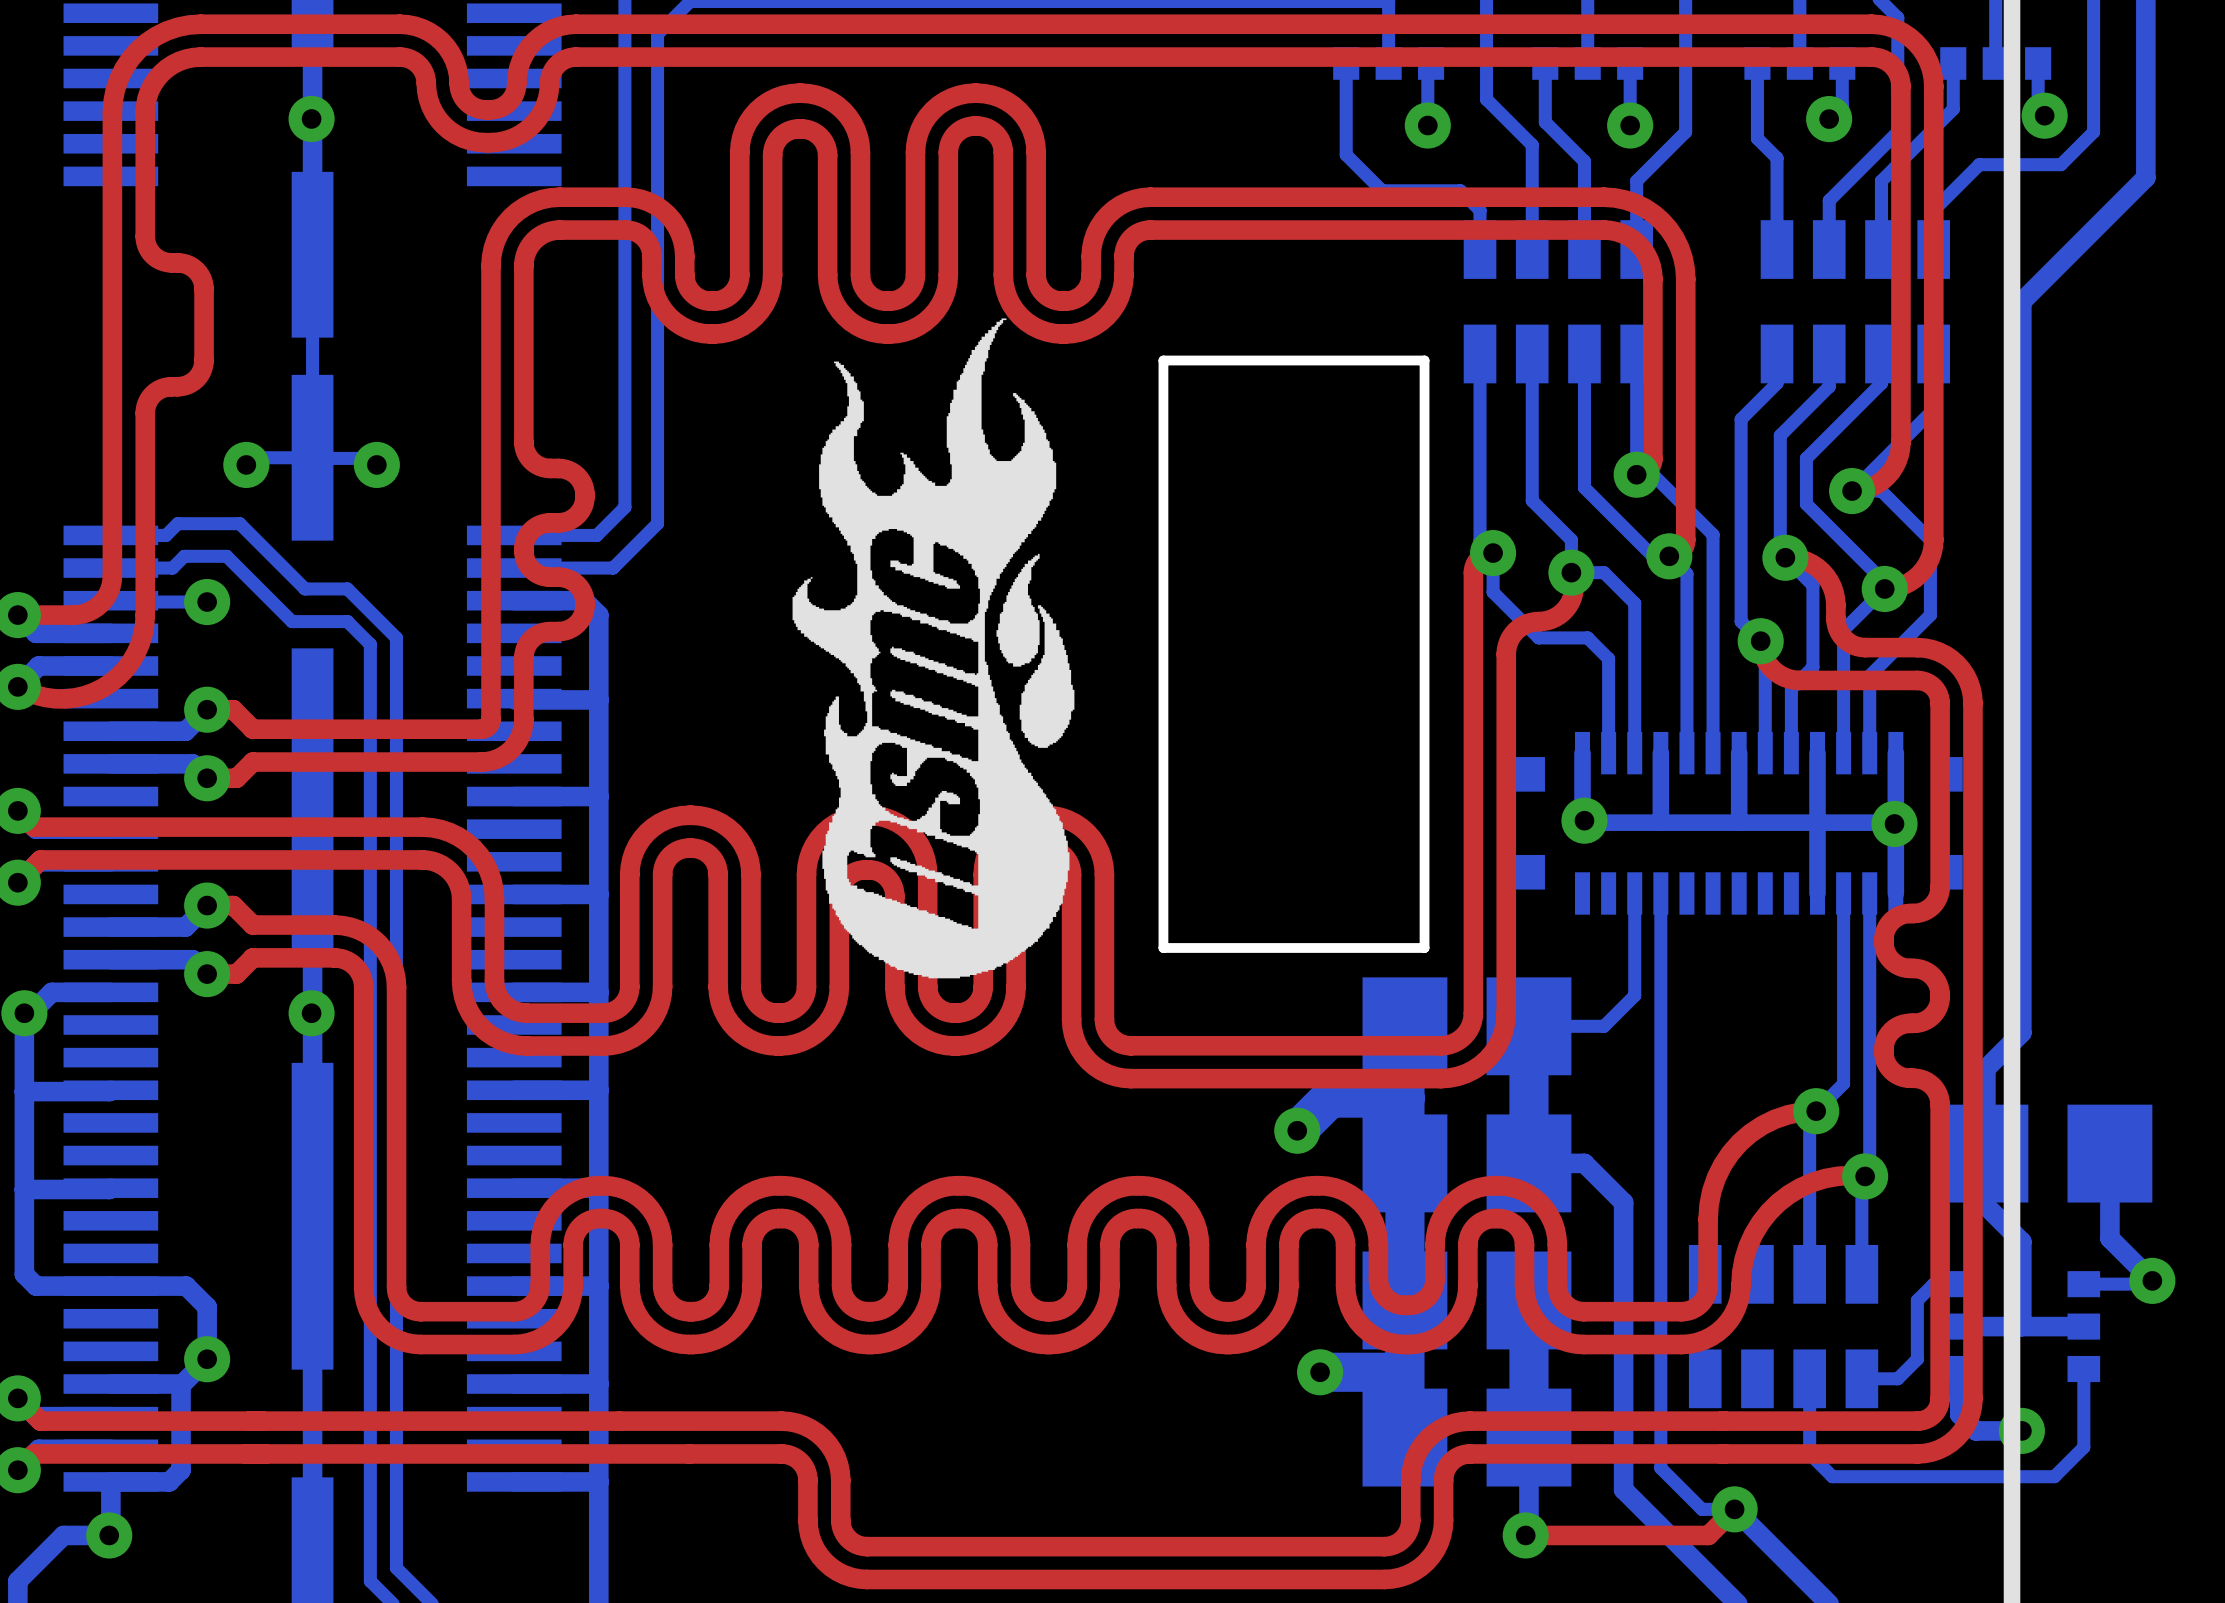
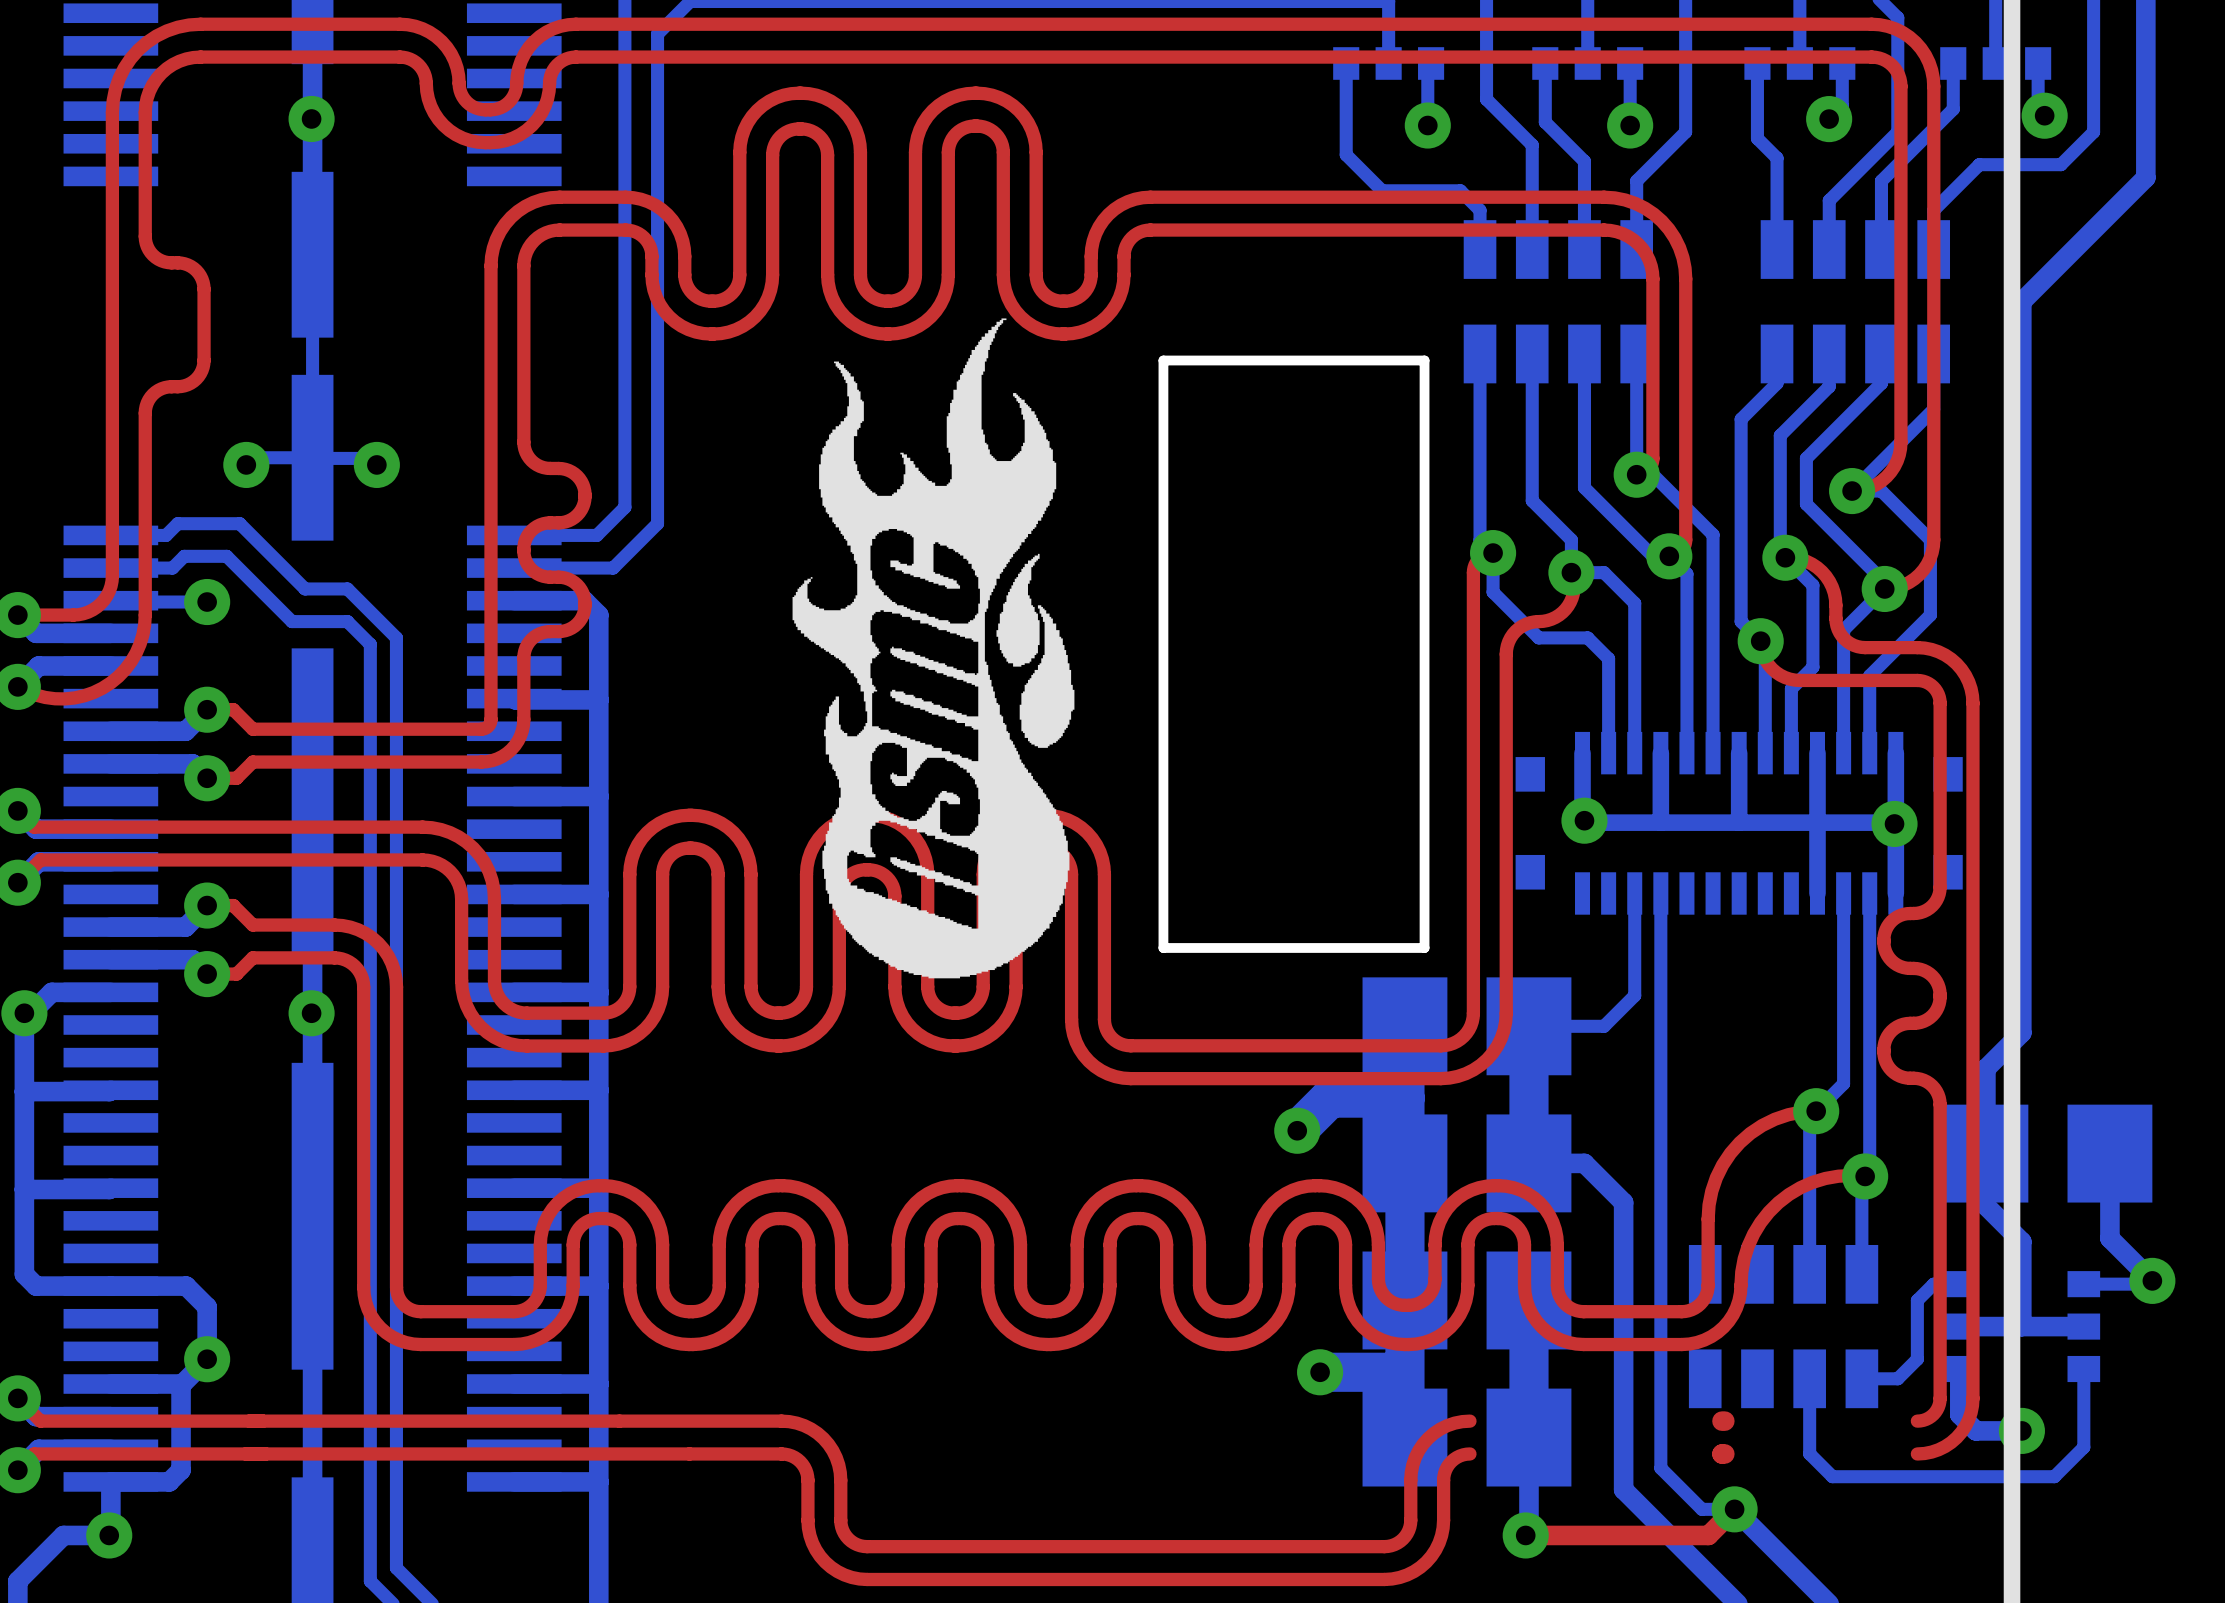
top track width: thick (1636, 474) (1648, 469) (1652, 460) (1652, 278) (1651, 266) (1646, 254) (1633, 240) (1622, 233) (1604, 230) (1146, 230) (1134, 235) (1126, 246) (1121, 290) (1116, 304) (1106, 316) (1094, 326) (1080, 332) (1054, 333) (1039, 329) (1026, 321) (1015, 310) (1007, 297) (1003, 274) (1002, 145) (997, 136) (990, 129) (980, 126) (971, 126) (956, 133) (948, 148) (948, 274) (943, 297) (930, 316) (918, 326) (896, 333) (879, 333) (864, 329) (850, 321) (839, 310) (832, 297) (827, 274) (826, 148) (822, 139) (814, 132) (804, 129) (792, 129) (778, 139) (772, 151) (772, 274) (770, 290) (764, 304) (755, 316) (736, 329) (721, 333) (703, 333) (681, 326) (669, 316) (659, 304) (653, 290) (649, 246) (644, 237) (635, 232) (625, 230) (554, 230) (537, 237) (526, 252) (523, 265) (524, 448) (529, 458) (537, 464) (546, 468) (565, 469) (574, 473) (583, 484) (585, 496) (581, 509) (571, 519) (562, 522) (543, 523) (531, 530) (524, 542) (524, 554) (527, 564) (537, 573) (546, 576) (565, 578) (574, 582) (583, 593) (585, 605) (583, 615) (574, 626) (565, 630) (540, 633) (527, 644) (523, 657) (523, 725) (518, 740) (511, 749) (497, 758) (481, 762) (252, 762) (236, 778) (207, 778) -> thin (1636, 474) (1648, 469) (1652, 460) (1652, 278) (1651, 266) (1646, 254) (1633, 240) (1622, 233) (1604, 230) (1146, 230) (1134, 235) (1126, 246) (1121, 290) (1116, 304) (1106, 316) (1094, 326) (1080, 332) (1054, 333) (1039, 329) (1026, 321) (1015, 310) (1007, 297) (1003, 274) (1002, 145) (997, 136) (990, 129) (980, 126) (971, 126) (956, 133) (948, 148) (948, 274) (943, 297) (930, 316) (918, 326) (896, 333) (879, 333) (864, 329) (850, 321) (839, 310) (832, 297) (827, 274) (826, 148) (822, 139) (814, 132) (804, 129) (792, 129) (778, 139) (772, 151) (772, 274) (770, 290) (764, 304) (755, 316) (736, 329) (721, 333) (703, 333) (681, 326) (669, 316) (659, 304) (653, 290) (649, 246) (644, 237) (635, 232) (625, 230) (554, 230) (537, 237) (526, 252) (523, 265) (524, 448) (529, 458) (537, 464) (546, 468) (565, 469) (574, 473) (583, 484) (585, 496) (581, 509) (571, 519) (562, 522) (543, 523) (531, 530) (524, 542) (524, 554) (527, 564) (537, 573) (546, 576) (565, 578) (574, 582) (583, 593) (585, 605) (583, 615) (574, 626) (565, 630) (540, 633) (527, 644) (523, 657) (523, 725) (518, 740) (511, 749) (497, 758) (481, 762) (252, 762) (236, 778) (207, 778)
top track width: thick (1852, 491) (1870, 487) (1886, 476) (1897, 460) (1900, 442) (1900, 86) (1894, 68) (1879, 58) (575, 57) (562, 60) (553, 70) (545, 106) (532, 125) (513, 138) (498, 142) (485, 142) (462, 138) (443, 125) (430, 106) (422, 70) (415, 62) (406, 57) (193, 57) (172, 64) (161, 73) (149, 91) (145, 105) (146, 243) (150, 252) (158, 259) (187, 264) (200, 276) (204, 289) (204, 360) (202, 370) (193, 381) (184, 385) (168, 386) (158, 390) (150, 397) (146, 406) (145, 615) (142, 634) (136, 653) (125, 669) (110, 682) (93, 692) (74, 697) (55, 698) (35, 695) (17, 686) -> thin (1852, 491) (1870, 487) (1886, 476) (1897, 460) (1900, 442) (1900, 86) (1894, 68) (1879, 58) (575, 57) (562, 60) (553, 70) (545, 106) (532, 125) (513, 138) (498, 142) (485, 142) (462, 138) (443, 125) (430, 106) (422, 70) (415, 62) (406, 57) (193, 57) (172, 64) (161, 73) (149, 91) (145, 105) (146, 243) (150, 252) (158, 259) (187, 264) (200, 276) (204, 289) (204, 360) (202, 370) (193, 381) (184, 385) (168, 386) (158, 390) (150, 397) (146, 406) (145, 615) (142, 634) (136, 653) (125, 669) (110, 682) (93, 692) (74, 697) (55, 698) (35, 695) (17, 686)
top track width: thick (1493, 553) (1479, 558) (1473, 572) (1473, 1017) (1470, 1025) (1463, 1036) (1453, 1043) (1445, 1045) (1130, 1045) (1117, 1042) (1107, 1032) (1104, 1022) (1104, 874) (1102, 859) (1096, 844) (1087, 832) (1074, 823) (1052, 815) (1034, 815) (1012, 823) (1000, 832) (987, 851) (983, 874) (982, 990) (977, 1002) (966, 1011) (956, 1013) (943, 1011) (935, 1005) (928, 993) (927, 874) (925, 859) (919, 844) (910, 832) (898, 823) (883, 817) (868, 815) (850, 817) (836, 823) (823, 832) (814, 844) (808, 859) (806, 874) (805, 993) (798, 1005) (786, 1012) (773, 1012) (761, 1007) (754, 999) (751, 990) (750, 874) (746, 851) (733, 832) (721, 823) (707, 817) (689, 815) (673, 817) (659, 823) (647, 832) (634, 851) (629, 874) (629, 990) (624, 1002) (616, 1009) (606, 1012) (527, 1013) (518, 1012) (507, 1006) (498, 996) (495, 989) (494, 899) (488, 871) (473, 848) (450, 832) (422, 827) (34, 827) (17, 810) -> thin (1493, 553) (1479, 558) (1473, 572) (1473, 1017) (1470, 1025) (1463, 1036) (1453, 1043) (1445, 1045) (1130, 1045) (1117, 1042) (1107, 1032) (1104, 1022) (1104, 874) (1102, 859) (1096, 844) (1087, 832) (1074, 823) (1052, 815) (1034, 815) (1012, 823) (1000, 832) (987, 851) (983, 874) (982, 990) (977, 1002) (966, 1011) (956, 1013) (943, 1011) (935, 1005) (928, 993) (927, 874) (925, 859) (919, 844) (910, 832) (898, 823) (883, 817) (868, 815) (850, 817) (836, 823) (823, 832) (814, 844) (808, 859) (806, 874) (805, 993) (798, 1005) (786, 1012) (773, 1012) (761, 1007) (754, 999) (751, 990) (750, 874) (746, 851) (733, 832) (721, 823) (707, 817) (689, 815) (673, 817) (659, 823) (647, 832) (634, 851) (629, 874) (629, 990) (624, 1002) (616, 1009) (606, 1012) (527, 1013) (518, 1012) (507, 1006) (498, 996) (495, 989) (494, 899) (488, 871) (473, 848) (450, 832) (422, 827) (34, 827) (17, 810)
top track width: thick (1669, 556) (1680, 551) (1685, 539) (1685, 268) (1679, 247) (1668, 229) (1644, 208) (1625, 199) (1604, 197) (1142, 197) (1120, 205) (1103, 220) (1093, 241) (1090, 278) (1087, 288) (1074, 299) (1059, 301) (1043, 293) (1036, 278) (1036, 152) (1031, 129) (1018, 110) (1006, 101) (984, 93) (966, 93) (952, 97) (938, 105) (927, 116) (919, 129) (915, 152) (914, 281) (910, 290) (902, 297) (892, 301) (883, 301) (868, 293) (860, 278) (860, 152) (855, 129) (843, 110) (830, 101) (808, 93) (791, 93) (769, 101) (757, 110) (747, 122) (741, 137) (739, 152) (739, 278) (736, 288) (726, 297) (716, 301) (707, 301) (697, 297) (690, 290) (685, 278) (682, 241) (676, 226) (661, 209) (640, 199) (625, 197) (559, 197) (541, 199) (517, 211) (505, 224) (496, 239) (490, 265) (490, 719) (488, 726) (481, 729) (252, 729) (233, 709) (207, 709) -> thin (1669, 556) (1680, 551) (1685, 539) (1685, 268) (1679, 247) (1668, 229) (1644, 208) (1625, 199) (1604, 197) (1142, 197) (1120, 205) (1103, 220) (1093, 241) (1090, 278) (1087, 288) (1074, 299) (1059, 301) (1043, 293) (1036, 278) (1036, 152) (1031, 129) (1018, 110) (1006, 101) (984, 93) (966, 93) (952, 97) (938, 105) (927, 116) (919, 129) (915, 152) (914, 281) (910, 290) (902, 297) (892, 301) (883, 301) (868, 293) (860, 278) (860, 152) (855, 129) (843, 110) (830, 101) (808, 93) (791, 93) (769, 101) (757, 110) (747, 122) (741, 137) (739, 152) (739, 278) (736, 288) (726, 297) (716, 301) (707, 301) (697, 297) (690, 290) (685, 278) (682, 241) (676, 226) (661, 209) (640, 199) (625, 197) (559, 197) (541, 199) (517, 211) (505, 224) (496, 239) (490, 265) (490, 719) (488, 726) (481, 729) (252, 729) (233, 709) (207, 709)
top track width: thick (1785, 557) (1806, 561) (1817, 567) (1826, 576) (1834, 592) (1836, 625) (1847, 641) (1861, 647) (1917, 647) (1938, 651) (1951, 659) (1961, 669) (1968, 681) (1972, 695) (1972, 1405) (1968, 1419) (1956, 1437) (1938, 1449) (1917, 1453) -> thin (1785, 557) (1806, 561) (1817, 567) (1826, 576) (1834, 592) (1836, 625) (1847, 641) (1861, 647) (1917, 647) (1938, 651) (1951, 659) (1961, 669) (1968, 681) (1972, 695) (1972, 1405) (1968, 1419) (1956, 1437) (1938, 1449) (1917, 1453)
top track width: thick (1571, 572) (1573, 589) (1572, 598) (1565, 609) (1551, 619) (1522, 625) (1512, 634) (1507, 645) (1505, 1021) (1501, 1038) (1492, 1053) (1473, 1069) (1457, 1076) (1440, 1078) (1130, 1078) (1115, 1076) (1101, 1070) (1083, 1055) (1073, 1034) (1071, 1019) (1071, 871) (1063, 855) (1048, 848) (1039, 848) (1029, 851) (1021, 858) (1016, 867) (1016, 986) (1011, 1009) (1003, 1022) (986, 1038) (972, 1043) (956, 1046) (938, 1043) (924, 1038) (912, 1028) (899, 1009) (894, 986) (894, 892) (887, 877) (871, 870) (862, 870) (852, 873) (844, 880) (840, 889) (838, 994) (831, 1016) (822, 1028) (809, 1038) (795, 1043) (780, 1046) (762, 1043) (747, 1038) (735, 1028) (722, 1009) (718, 986) (717, 871) (710, 855) (698, 849) (685, 848) (675, 851) (668, 858) (663, 867) (662, 986) (658, 1009) (645, 1028) (633, 1038) (618, 1043) (603, 1046) (518, 1045) (494, 1037) (480, 1026) (466, 1005) (462, 989) (460, 888) (450, 871) (432, 861) (40, 859) (17, 882) -> thin (1571, 572) (1573, 589) (1572, 598) (1565, 609) (1551, 619) (1522, 625) (1512, 634) (1507, 645) (1505, 1021) (1501, 1038) (1492, 1053) (1473, 1069) (1457, 1076) (1440, 1078) (1130, 1078) (1115, 1076) (1101, 1070) (1083, 1055) (1073, 1034) (1071, 1019) (1071, 871) (1063, 855) (1048, 848) (1039, 848) (1029, 851) (1021, 858) (1016, 867) (1016, 986) (1011, 1009) (1003, 1022) (986, 1038) (972, 1043) (956, 1046) (938, 1043) (924, 1038) (912, 1028) (899, 1009) (894, 986) (894, 892) (887, 877) (871, 870) (862, 870) (852, 873) (844, 880) (840, 889) (838, 994) (831, 1016) (822, 1028) (809, 1038) (795, 1043) (780, 1046) (762, 1043) (747, 1038) (735, 1028) (722, 1009) (718, 986) (717, 871) (710, 855) (698, 849) (685, 848) (675, 851) (668, 858) (663, 867) (662, 986) (658, 1009) (645, 1028) (633, 1038) (618, 1043) (603, 1046) (518, 1045) (494, 1037) (480, 1026) (466, 1005) (462, 989) (460, 888) (450, 871) (432, 861) (40, 859) (17, 882)
top track width: thick (1884, 588) (1903, 585) (1919, 574) (1930, 558) (1933, 539) (1933, 78) (1929, 62) (1915, 42) (1902, 32) (1887, 26) (1871, 24) (575, 24) (553, 28) (534, 41) (521, 60) (515, 90) (511, 99) (500, 107) (485, 109) (472, 106) (462, 96) (457, 68) (446, 47) (429, 32) (415, 26) (399, 24) (200, 24) (177, 27) (166, 30) (156, 36) (138, 50) (124, 68) (115, 89) (113, 100) (111, 586) (100, 603) (83, 613) (17, 615) -> thin (1884, 588) (1903, 585) (1919, 574) (1930, 558) (1933, 539) (1933, 78) (1929, 62) (1915, 42) (1902, 32) (1887, 26) (1871, 24) (575, 24) (553, 28) (534, 41) (521, 60) (515, 90) (511, 99) (500, 107) (485, 109) (472, 106) (462, 96) (457, 68) (446, 47) (429, 32) (415, 26) (399, 24) (200, 24) (177, 27) (166, 30) (156, 36) (138, 50) (124, 68) (115, 89) (113, 100) (111, 586) (100, 603) (83, 613) (17, 615)
top track width: thick (1760, 641) (1762, 651) (1768, 665) (1780, 675) (1789, 679) (1920, 680) (1931, 685) (1939, 697) (1939, 893) (1934, 903) (1926, 909) (1903, 914) (1894, 918) (1887, 926) (1883, 939) (1885, 952) (1891, 960) (1903, 967) (1926, 971) (1936, 981) (1939, 991) (1939, 1003) (1932, 1015) (1923, 1021) (1903, 1024) (1894, 1028) (1887, 1036) (1883, 1049) (1885, 1061) (1891, 1070) (1903, 1077) (1926, 1081) (1936, 1091) (1939, 1101) (1939, 1401) (1937, 1409) (1931, 1416) (1917, 1421) -> thin (1760, 641) (1762, 651) (1768, 665) (1780, 675) (1789, 679) (1920, 680) (1931, 685) (1939, 697) (1939, 893) (1934, 903) (1926, 909) (1903, 914) (1894, 918) (1887, 926) (1883, 939) (1885, 952) (1891, 960) (1903, 967) (1926, 971) (1936, 981) (1939, 991) (1939, 1003) (1932, 1015) (1923, 1021) (1903, 1024) (1894, 1028) (1887, 1036) (1883, 1049) (1885, 1061) (1891, 1070) (1903, 1077) (1926, 1081) (1936, 1091) (1939, 1101) (1939, 1401) (1937, 1409) (1931, 1416) (1917, 1421)
top track width: thick (207, 905) (233, 905) (252, 925) (334, 925) (350, 927) (372, 937) (388, 956) (394, 971) (396, 987) (396, 1290) (403, 1304) (417, 1311) (513, 1311) (530, 1306) (539, 1292) (540, 1237) (548, 1215) (557, 1203) (569, 1193) (584, 1187) (599, 1185) (626, 1190) (639, 1197) (650, 1208) (658, 1222) (662, 1237) (662, 1285) (664, 1295) (672, 1306) (685, 1311) (696, 1311) (706, 1308) (717, 1295) (719, 1285) (719, 1237) (723, 1222) (731, 1208) (742, 1197) (755, 1190) (778, 1185) (805, 1190) (818, 1197) (829, 1208) (837, 1222) (841, 1237) (841, 1285) (843, 1295) (851, 1306) (864, 1311) (875, 1311) (885, 1308) (896, 1295) (898, 1285) (898, 1237) (902, 1222) (910, 1208) (921, 1197) (934, 1190) (957, 1185) (983, 1190) (997, 1197) (1008, 1208) (1016, 1222) (1020, 1237) (1020, 1285) (1022, 1295) (1030, 1306) (1043, 1311) (1054, 1311) (1063, 1308) (1075, 1295) (1077, 1285) (1077, 1237) (1081, 1222) (1089, 1208) (1100, 1197) (1113, 1190) (1136, 1185) (1155, 1187) (1169, 1193) (1182, 1203) (1191, 1215) (1198, 1237) (1200, 1292) (1207, 1303) (1219, 1310) (1239, 1309) (1252, 1298) (1255, 1288) (1256, 1237) (1260, 1222) (1273, 1203) (1292, 1190) (1307, 1186) (1326, 1186) (1341, 1190) (1361, 1203) (1370, 1215) (1376, 1229) (1380, 1289) (1391, 1301) (1408, 1305) (1424, 1299) (1433, 1289) (1435, 1278) (1435, 1237) (1439, 1222) (1447, 1208) (1458, 1197) (1471, 1190) (1498, 1185) (1513, 1187) (1527, 1193) (1540, 1203) (1549, 1215) (1556, 1237) (1558, 1292) (1567, 1306) (1583, 1311) (1685, 1311) (1697, 1306) (1707, 1292) (1709, 1205) (1716, 1177) (1722, 1165) (1739, 1142) (1762, 1125) (1788, 1114) (1816, 1111) -> thin (207, 905) (233, 905) (252, 925) (334, 925) (350, 927) (372, 937) (388, 956) (394, 971) (396, 987) (396, 1290) (403, 1304) (417, 1311) (513, 1311) (530, 1306) (539, 1292) (540, 1237) (548, 1215) (557, 1203) (569, 1193) (584, 1187) (599, 1185) (626, 1190) (639, 1197) (650, 1208) (658, 1222) (662, 1237) (662, 1285) (664, 1295) (672, 1306) (685, 1311) (696, 1311) (706, 1308) (717, 1295) (719, 1285) (719, 1237) (723, 1222) (731, 1208) (742, 1197) (755, 1190) (778, 1185) (805, 1190) (818, 1197) (829, 1208) (837, 1222) (841, 1237) (841, 1285) (843, 1295) (851, 1306) (864, 1311) (875, 1311) (885, 1308) (896, 1295) (898, 1285) (898, 1237) (902, 1222) (910, 1208) (921, 1197) (934, 1190) (957, 1185) (983, 1190) (997, 1197) (1008, 1208) (1016, 1222) (1020, 1237) (1020, 1285) (1022, 1295) (1030, 1306) (1043, 1311) (1054, 1311) (1063, 1308) (1075, 1295) (1077, 1285) (1077, 1237) (1081, 1222) (1089, 1208) (1100, 1197) (1113, 1190) (1136, 1185) (1155, 1187) (1169, 1193) (1182, 1203) (1191, 1215) (1198, 1237) (1200, 1292) (1207, 1303) (1219, 1310) (1239, 1309) (1252, 1298) (1255, 1288) (1256, 1237) (1260, 1222) (1273, 1203) (1292, 1190) (1307, 1186) (1326, 1186) (1341, 1190) (1361, 1203) (1370, 1215) (1376, 1229) (1380, 1289) (1391, 1301) (1408, 1305) (1424, 1299) (1433, 1289) (1435, 1278) (1435, 1237) (1439, 1222) (1447, 1208) (1458, 1197) (1471, 1190) (1498, 1185) (1513, 1187) (1527, 1193) (1540, 1203) (1549, 1215) (1556, 1237) (1558, 1292) (1567, 1306) (1583, 1311) (1685, 1311) (1697, 1306) (1707, 1292) (1709, 1205) (1716, 1177) (1722, 1165) (1739, 1142) (1762, 1125) (1788, 1114) (1816, 1111)
top track width: thick (207, 974) (236, 974) (252, 957) (338, 958) (352, 963) (359, 972) (363, 987) (364, 1294) (368, 1309) (380, 1327) (392, 1336) (413, 1344) (521, 1344) (536, 1340) (549, 1332) (565, 1314) (571, 1300) (575, 1234) (583, 1223) (599, 1218) (616, 1222) (627, 1234) (629, 1244) (630, 1293) (637, 1314) (652, 1332) (666, 1340) (681, 1344) (700, 1344) (715, 1340) (728, 1332) (739, 1321) (747, 1307) (751, 1293) (752, 1244) (754, 1234) (762, 1223) (778, 1218) (795, 1222) (806, 1234) (808, 1244) (809, 1293) (816, 1314) (831, 1332) (845, 1340) (860, 1344) (879, 1344) (894, 1340) (907, 1332) (918, 1321) (926, 1307) (930, 1293) (931, 1244) (933, 1234) (941, 1223) (957, 1218) (974, 1222) (985, 1234) (987, 1244) (988, 1293) (995, 1314) (1005, 1327) (1017, 1336) (1039, 1344) (1058, 1344) (1073, 1340) (1086, 1332) (1097, 1321) (1105, 1307) (1109, 1293) (1110, 1244) (1112, 1234) (1120, 1223) (1136, 1218) (1153, 1222) (1164, 1234) (1166, 1244) (1167, 1293) (1174, 1314) (1189, 1332) (1210, 1342) (1225, 1344) (1245, 1342) (1265, 1332) (1276, 1321) (1284, 1307) (1288, 1293) (1288, 1244) (1290, 1234) (1299, 1223) (1315, 1218) (1332, 1222) (1343, 1234) (1347, 1300) (1353, 1314) (1362, 1327) (1382, 1340) (1397, 1344) (1416, 1344) (1431, 1340) (1450, 1327) (1463, 1307) (1467, 1293) (1468, 1241) (1471, 1231) (1481, 1222) (1498, 1218) (1511, 1222) (1522, 1234) (1526, 1300) (1536, 1321) (1554, 1336) (1568, 1342) (1583, 1344) (1689, 1344) (1711, 1336) (1723, 1327) (1733, 1314) (1738, 1300) (1741, 1272) (1748, 1246) (1760, 1222) (1778, 1202) (1800, 1187) (1812, 1182) (1838, 1176) (1865, 1176) -> thin (207, 974) (236, 974) (252, 957) (338, 958) (352, 963) (359, 972) (363, 987) (364, 1294) (368, 1309) (380, 1327) (392, 1336) (413, 1344) (521, 1344) (536, 1340) (549, 1332) (565, 1314) (571, 1300) (575, 1234) (583, 1223) (599, 1218) (616, 1222) (627, 1234) (629, 1244) (630, 1293) (637, 1314) (652, 1332) (666, 1340) (681, 1344) (700, 1344) (715, 1340) (728, 1332) (739, 1321) (747, 1307) (751, 1293) (752, 1244) (754, 1234) (762, 1223) (778, 1218) (795, 1222) (806, 1234) (808, 1244) (809, 1293) (816, 1314) (831, 1332) (845, 1340) (860, 1344) (879, 1344) (894, 1340) (907, 1332) (918, 1321) (926, 1307) (930, 1293) (931, 1244) (933, 1234) (941, 1223) (957, 1218) (974, 1222) (985, 1234) (987, 1244) (988, 1293) (995, 1314) (1005, 1327) (1017, 1336) (1039, 1344) (1058, 1344) (1073, 1340) (1086, 1332) (1097, 1321) (1105, 1307) (1109, 1293) (1110, 1244) (1112, 1234) (1120, 1223) (1136, 1218) (1153, 1222) (1164, 1234) (1166, 1244) (1167, 1293) (1174, 1314) (1189, 1332) (1210, 1342) (1225, 1344) (1245, 1342) (1265, 1332) (1276, 1321) (1284, 1307) (1288, 1293) (1288, 1244) (1290, 1234) (1299, 1223) (1315, 1218) (1332, 1222) (1343, 1234) (1347, 1300) (1353, 1314) (1362, 1327) (1382, 1340) (1397, 1344) (1416, 1344) (1431, 1340) (1450, 1327) (1463, 1307) (1467, 1293) (1468, 1241) (1471, 1231) (1481, 1222) (1498, 1218) (1511, 1222) (1522, 1234) (1526, 1300) (1536, 1321) (1554, 1336) (1568, 1342) (1583, 1344) (1689, 1344) (1711, 1336) (1723, 1327) (1733, 1314) (1738, 1300) (1741, 1272) (1748, 1246) (1760, 1222) (1778, 1202) (1800, 1187) (1812, 1182) (1838, 1176) (1865, 1176)
top track width: thick (17, 1398) (40, 1421) (789, 1421) (804, 1425) (817, 1433) (832, 1450) (840, 1472) (840, 1520) (842, 1530) (851, 1541) (867, 1546) (1391, 1545) (1403, 1538) (1409, 1527) (1411, 1472) (1418, 1450) (1428, 1438) (1440, 1429) (1454, 1423) (1469, 1421) -> thin (17, 1398) (40, 1421) (789, 1421) (804, 1425) (817, 1433) (832, 1450) (840, 1472) (840, 1520) (842, 1530) (851, 1541) (867, 1546) (1391, 1545) (1403, 1538) (1409, 1527) (1411, 1472) (1418, 1450) (1428, 1438) (1440, 1429) (1454, 1423) (1469, 1421)
top track: (1469, 1421) (1917, 1421) -> none
top track: (1469, 1453) (1917, 1453) -> none
top track width: thick (1469, 1453) (1456, 1457) (1445, 1470) (1443, 1480) (1443, 1528) (1439, 1542) (1431, 1556) (1414, 1571) (1399, 1577) (1384, 1579) (867, 1579) (851, 1577) (831, 1567) (815, 1549) (808, 1528) (807, 1473) (797, 1459) (785, 1454) (34, 1453) (17, 1470) -> thin (1469, 1453) (1456, 1457) (1445, 1470) (1443, 1480) (1443, 1528) (1439, 1542) (1431, 1556) (1414, 1571) (1399, 1577) (1384, 1579) (867, 1579) (851, 1577) (831, 1567) (815, 1549) (808, 1528) (807, 1473) (797, 1459) (785, 1454) (34, 1453) (17, 1470)

